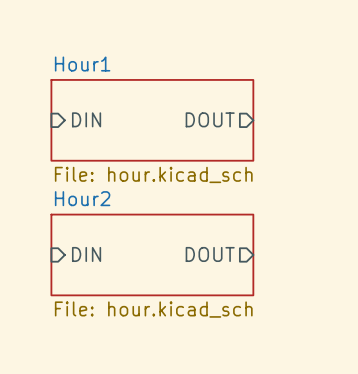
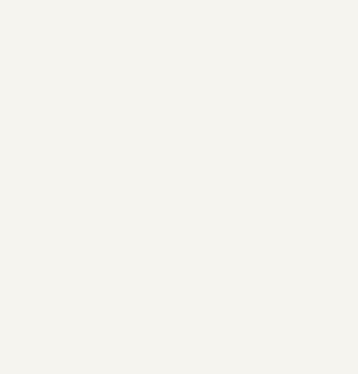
sheet pin: DIN (86, 119) -> none
sheet pin: DOUT (210, 119) -> none
sheet Hour1: File: hour.kicad_sch (152, 120) -> none
sheet pin: DIN (86, 254) -> none
sheet Hour2: File: hour.kicad_sch (152, 254) -> none
sheet pin: DOUT (210, 254) -> none

